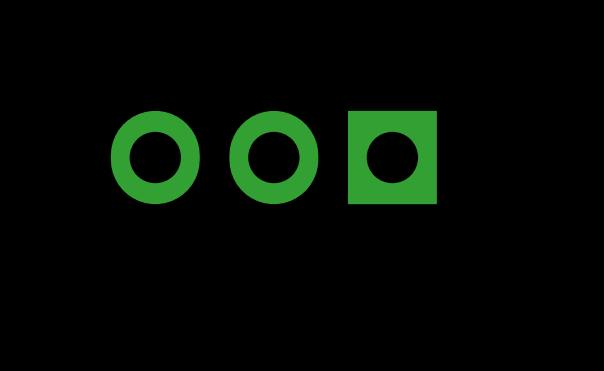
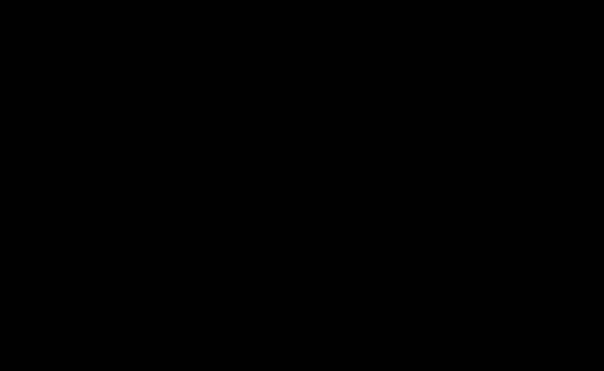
part: (273, 157) -> none

